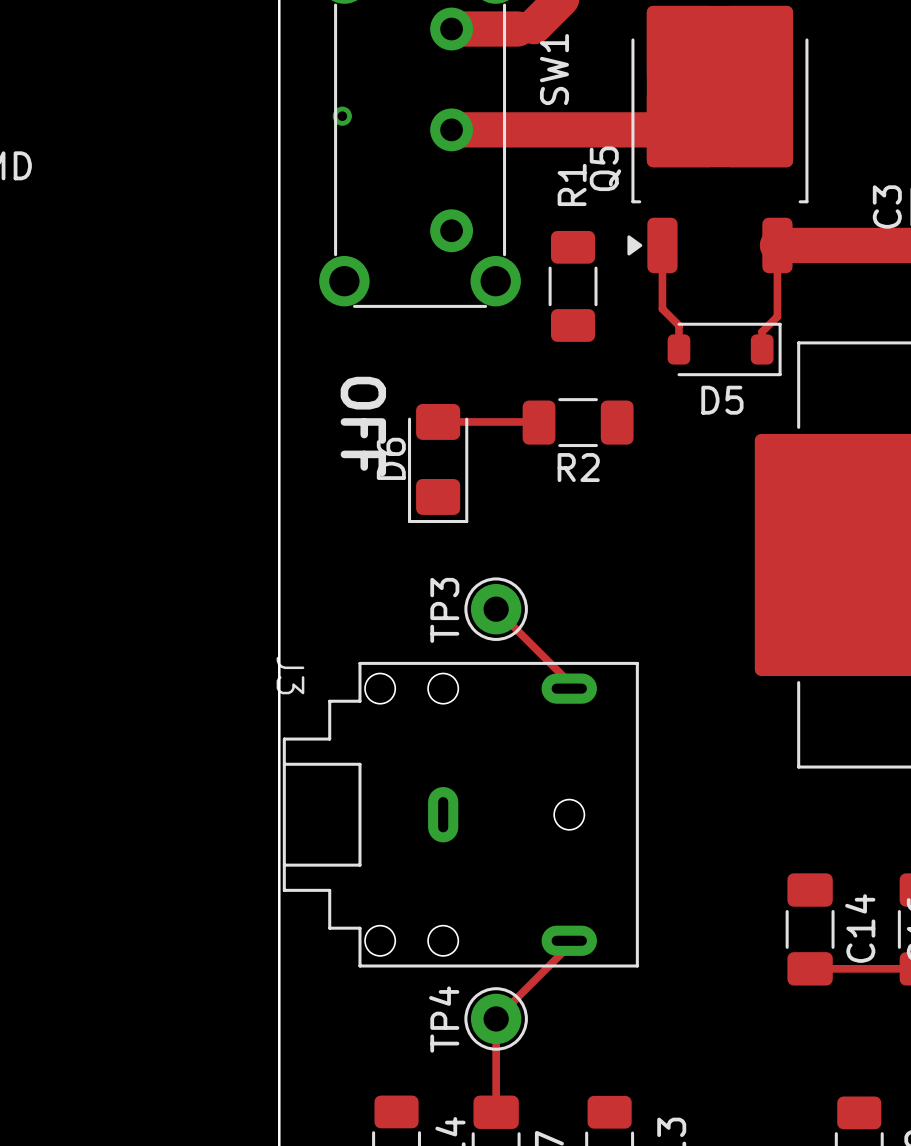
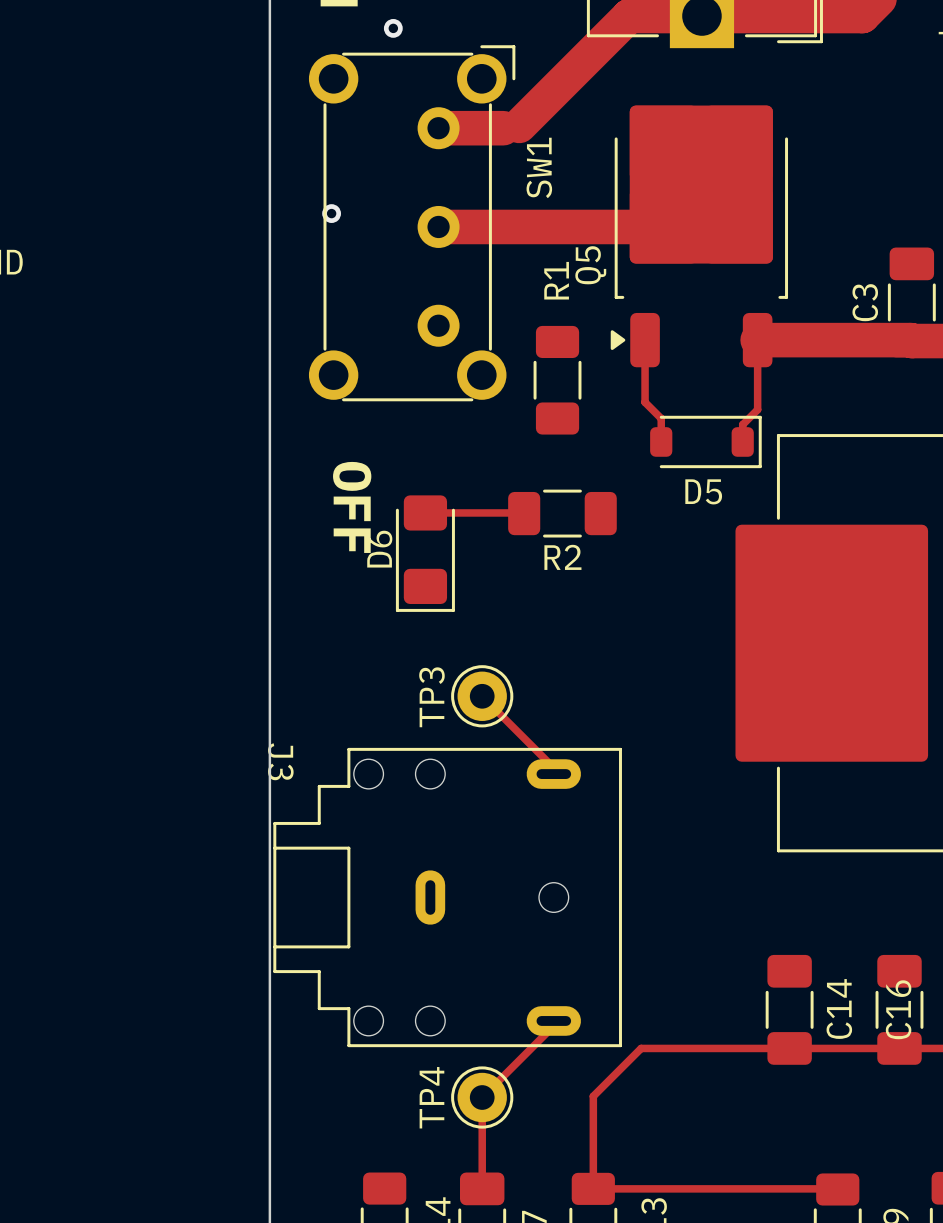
track: none -> (789, 1048) (641, 1048) (593, 1096) (593, 1188) (837, 1189)

